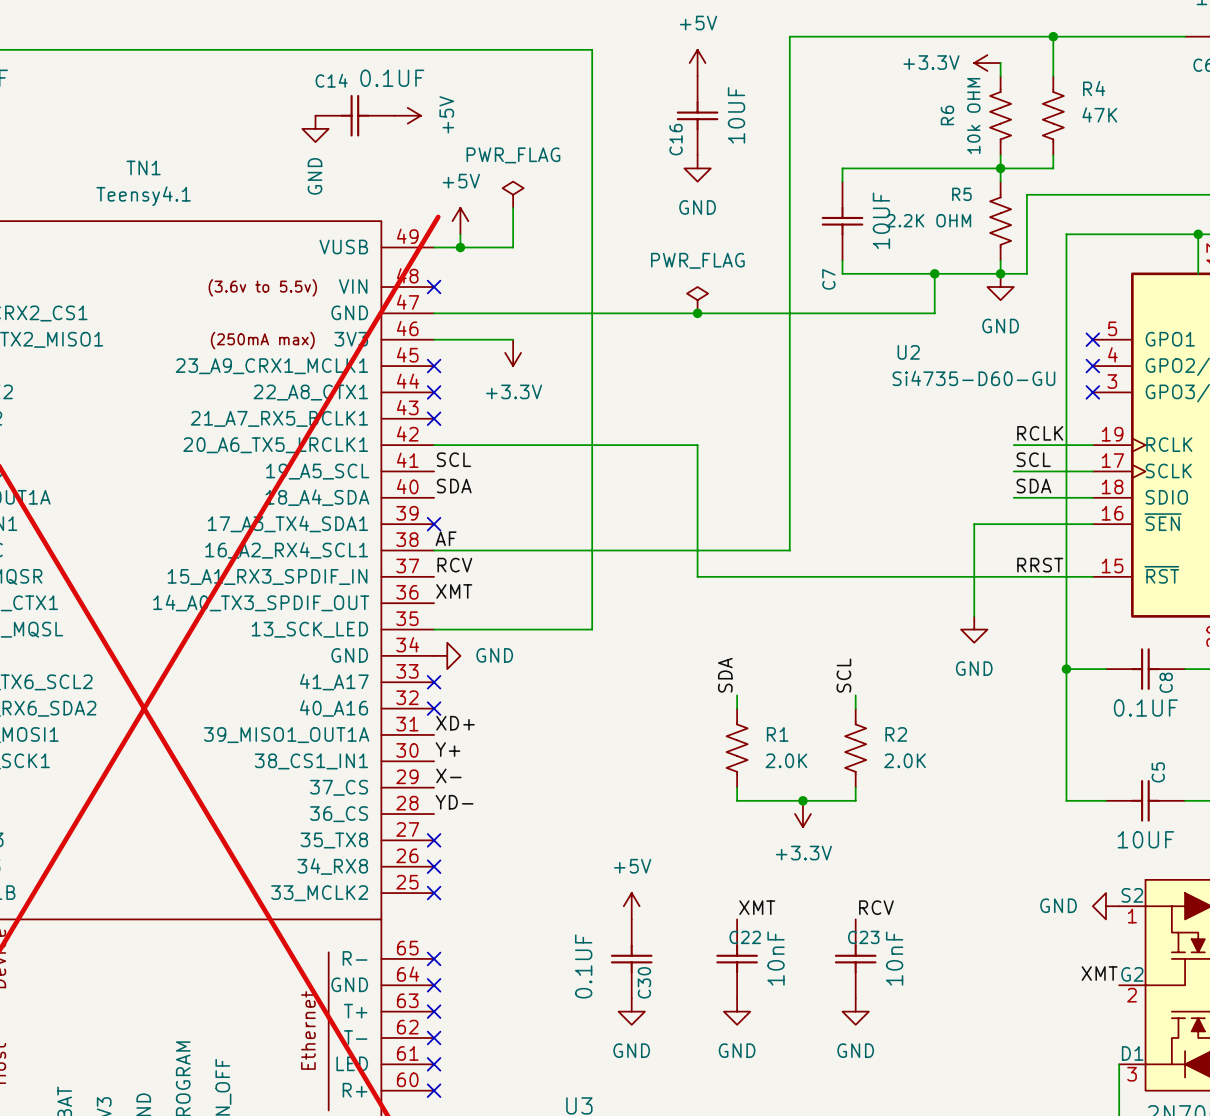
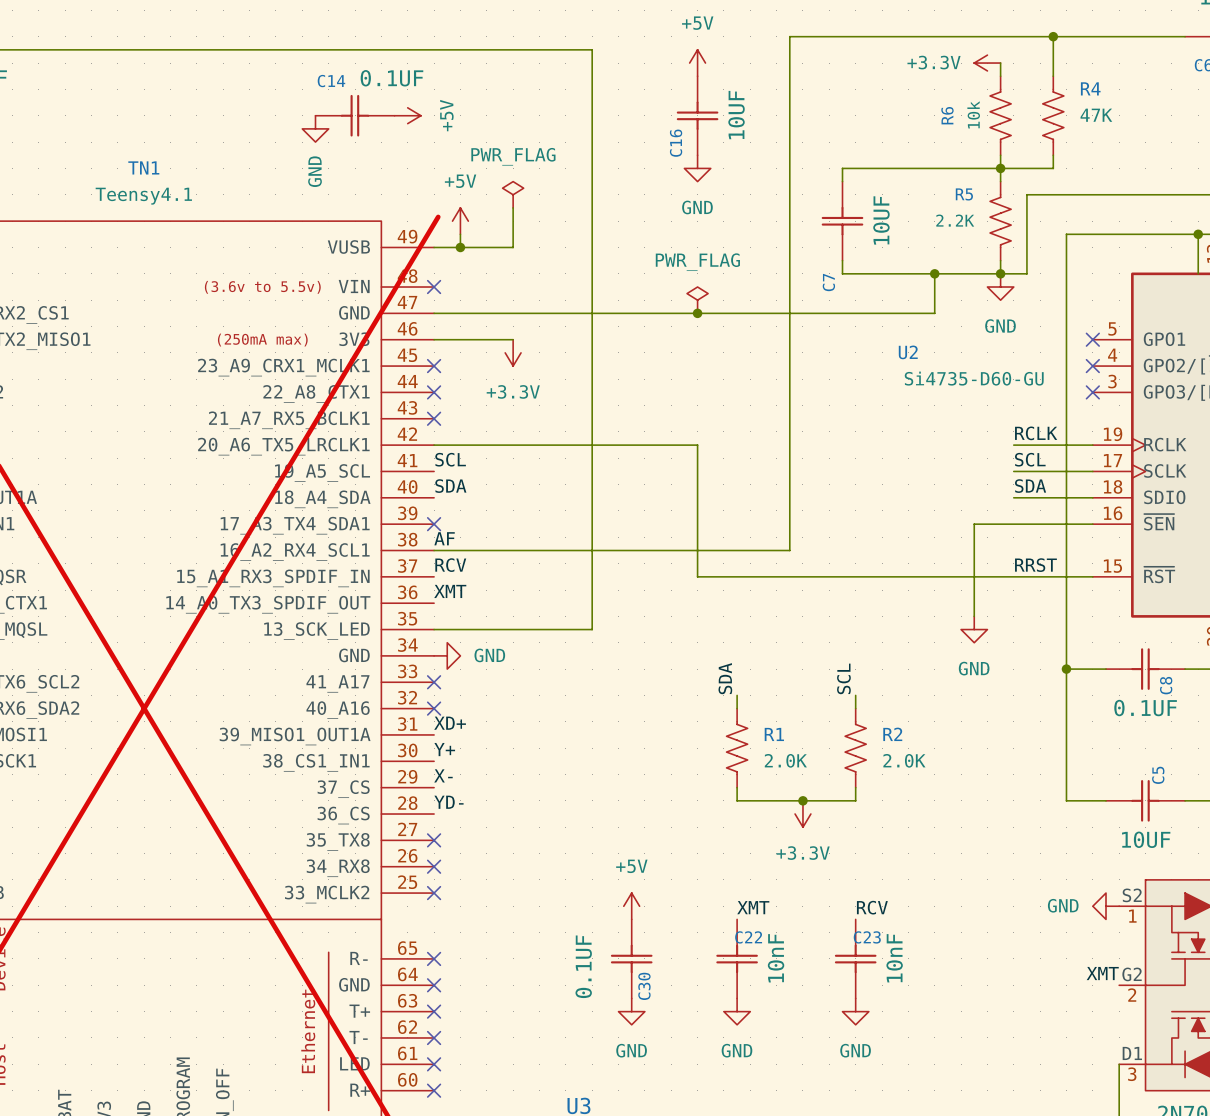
R6 value: 10k OHM (973, 116) -> 10k (973, 114)
R5 value: 2.2K OHM (928, 220) -> 2.2K (955, 220)

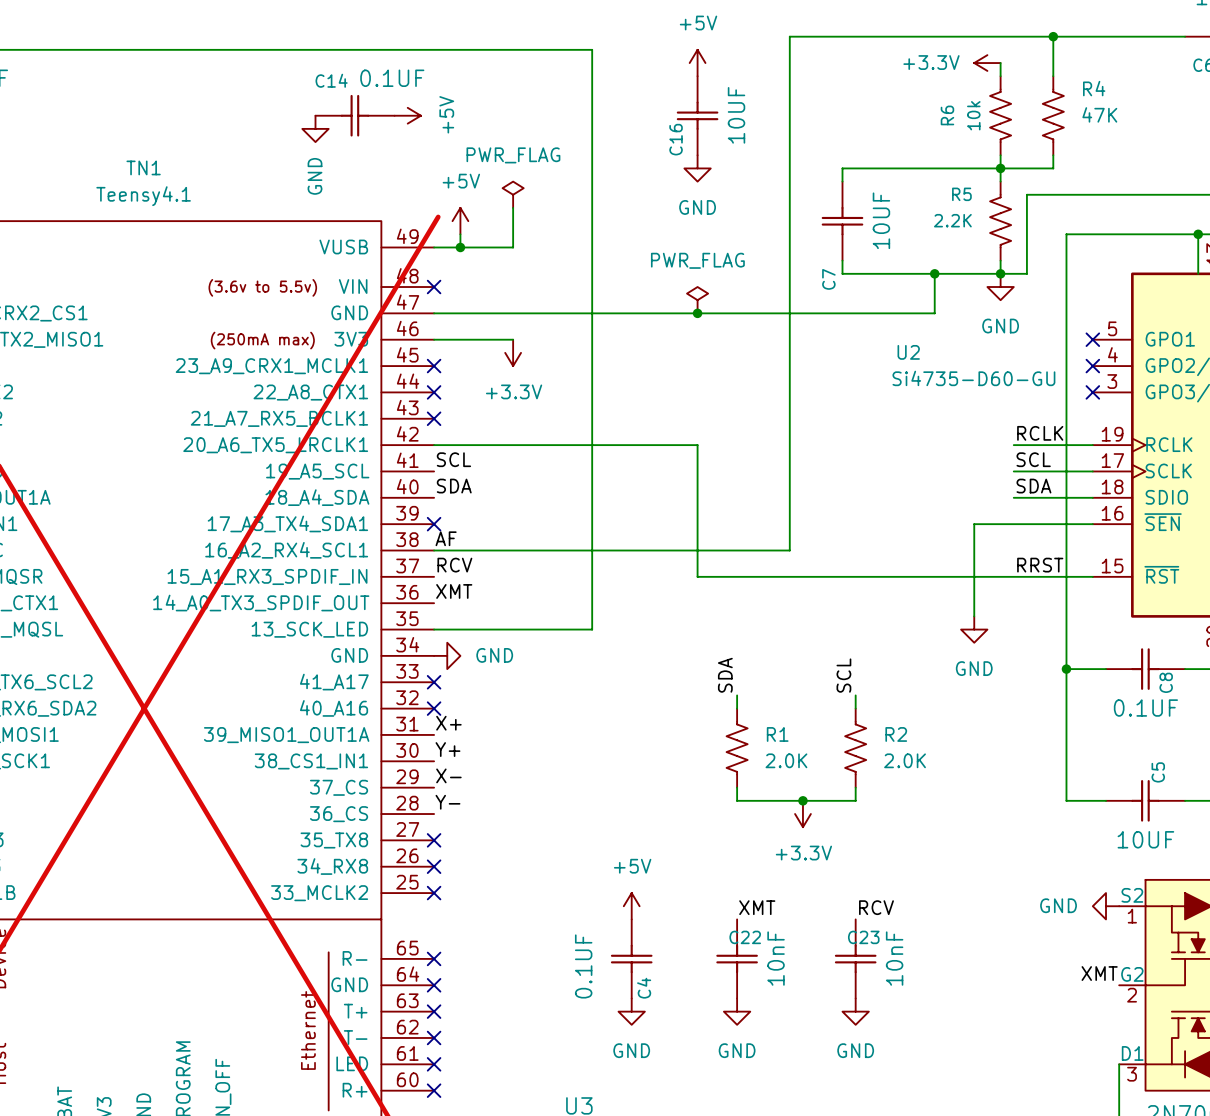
label: XD+ (450, 723) -> X+ (448, 723)
label: YD- (448, 802) -> Y- (447, 802)
C30 name: C30 (644, 986) -> C4 (644, 988)

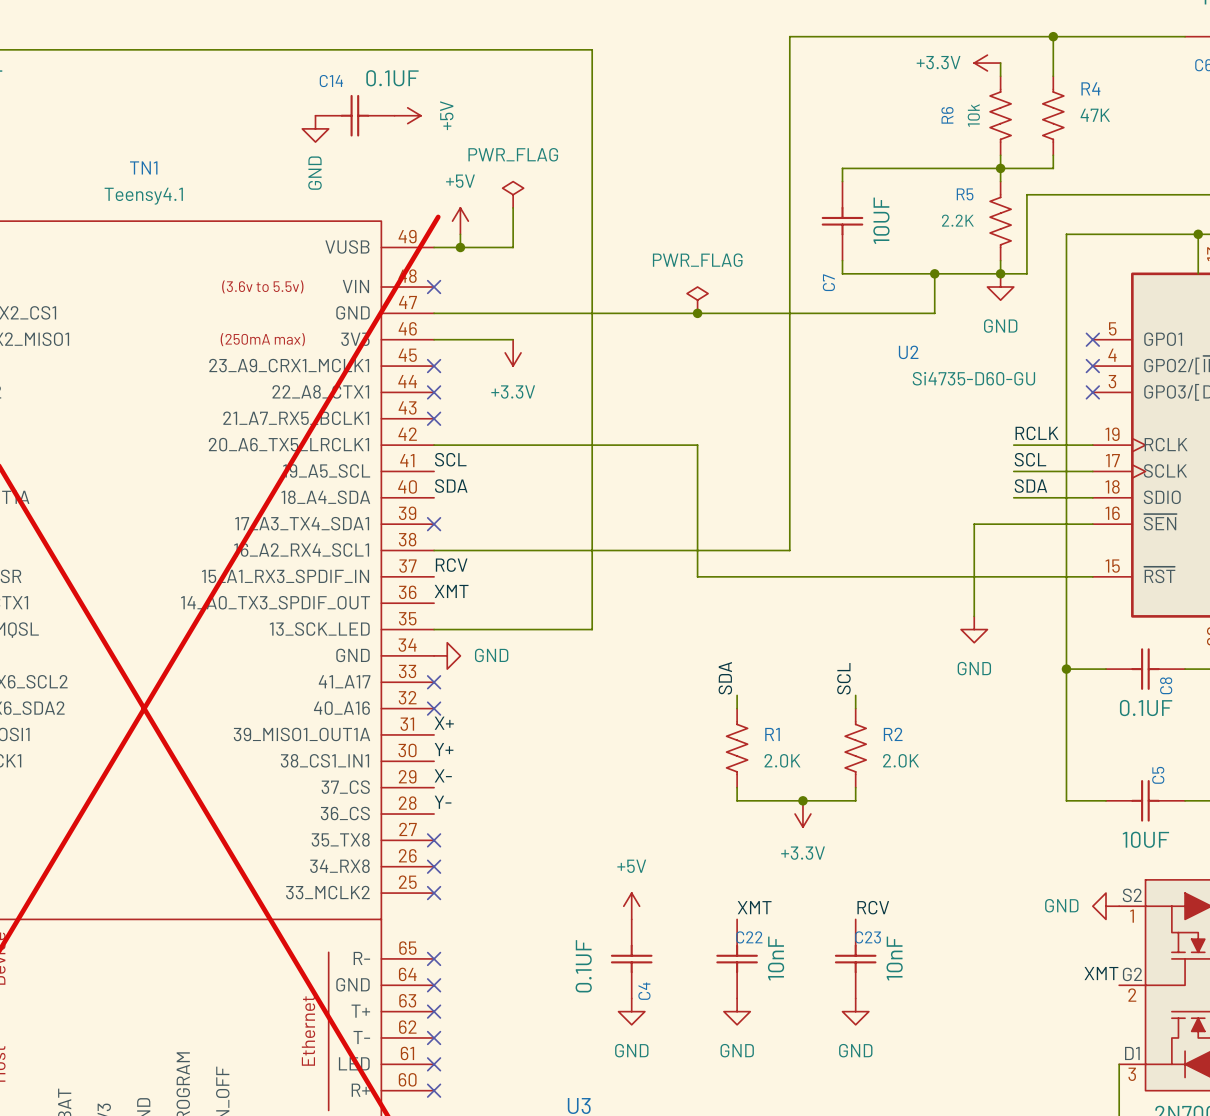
power symbol: +5V (697, 63) -> none
C16: 10UF (697, 115) -> none
power symbol: GND (697, 168) -> none
label: AF (446, 538) -> none
label: RRST (1040, 565) -> none

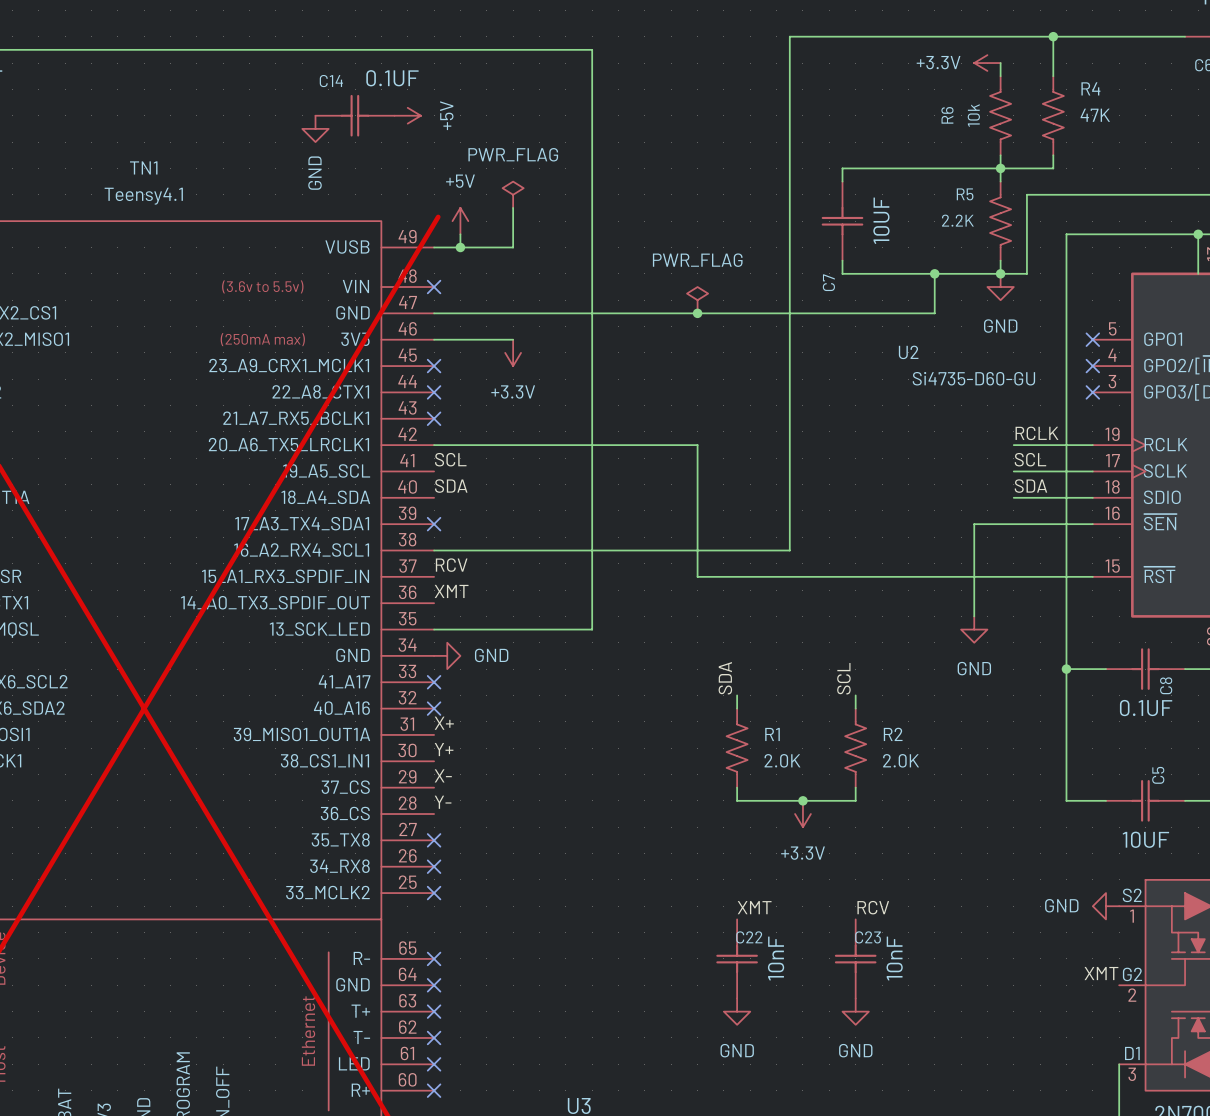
power symbol: +5V (631, 906) -> none
C4: 0.1UF (631, 958) -> none
power symbol: GND (631, 1011) -> none

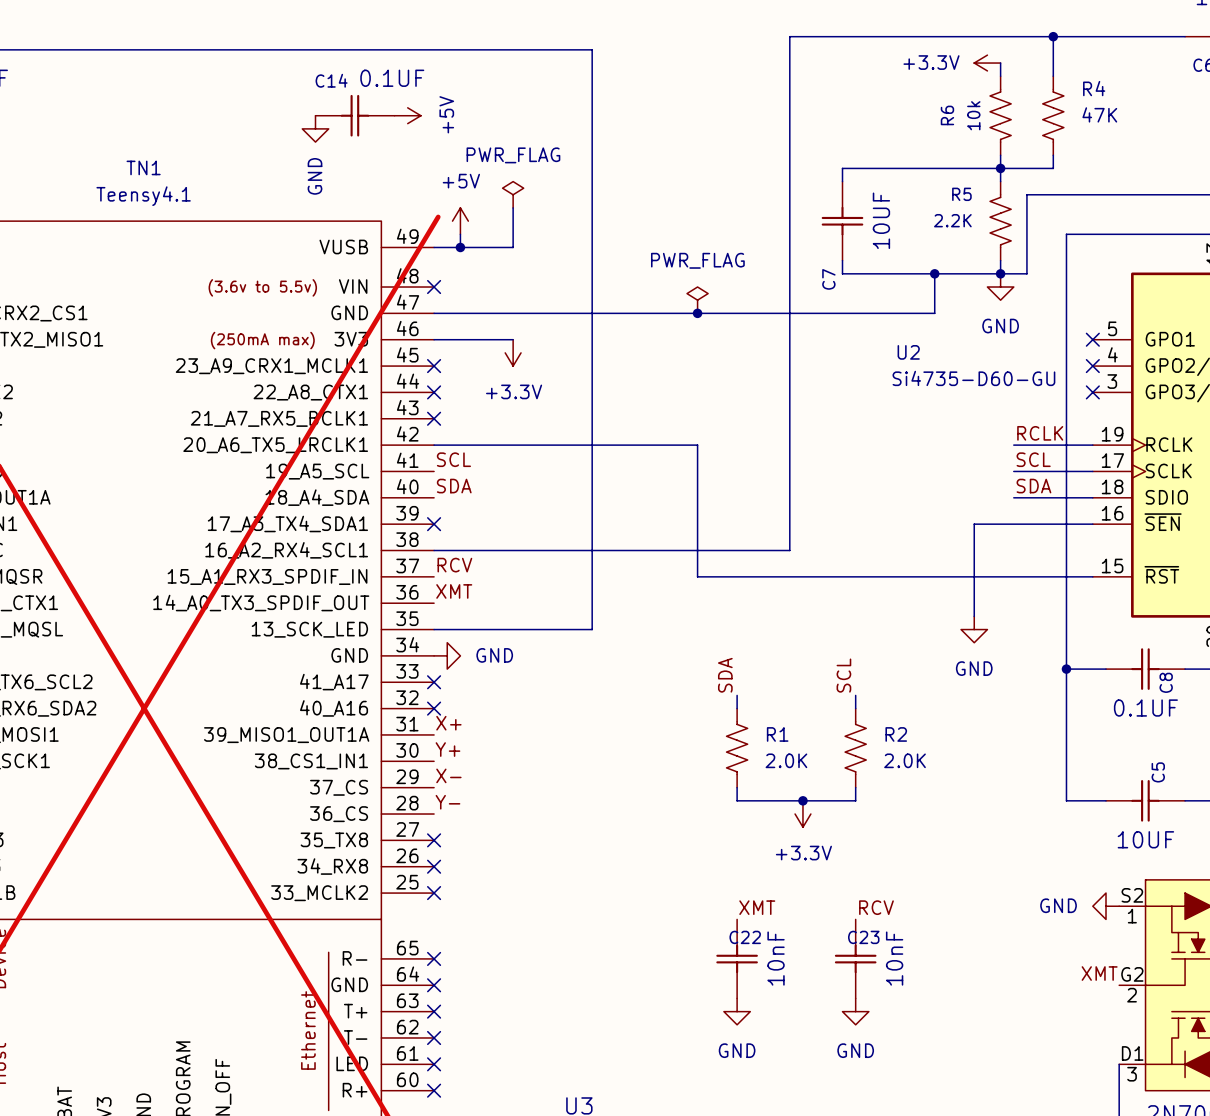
wire: (1198, 234) (1198, 273) -> none
junction: (1198, 234) -> none

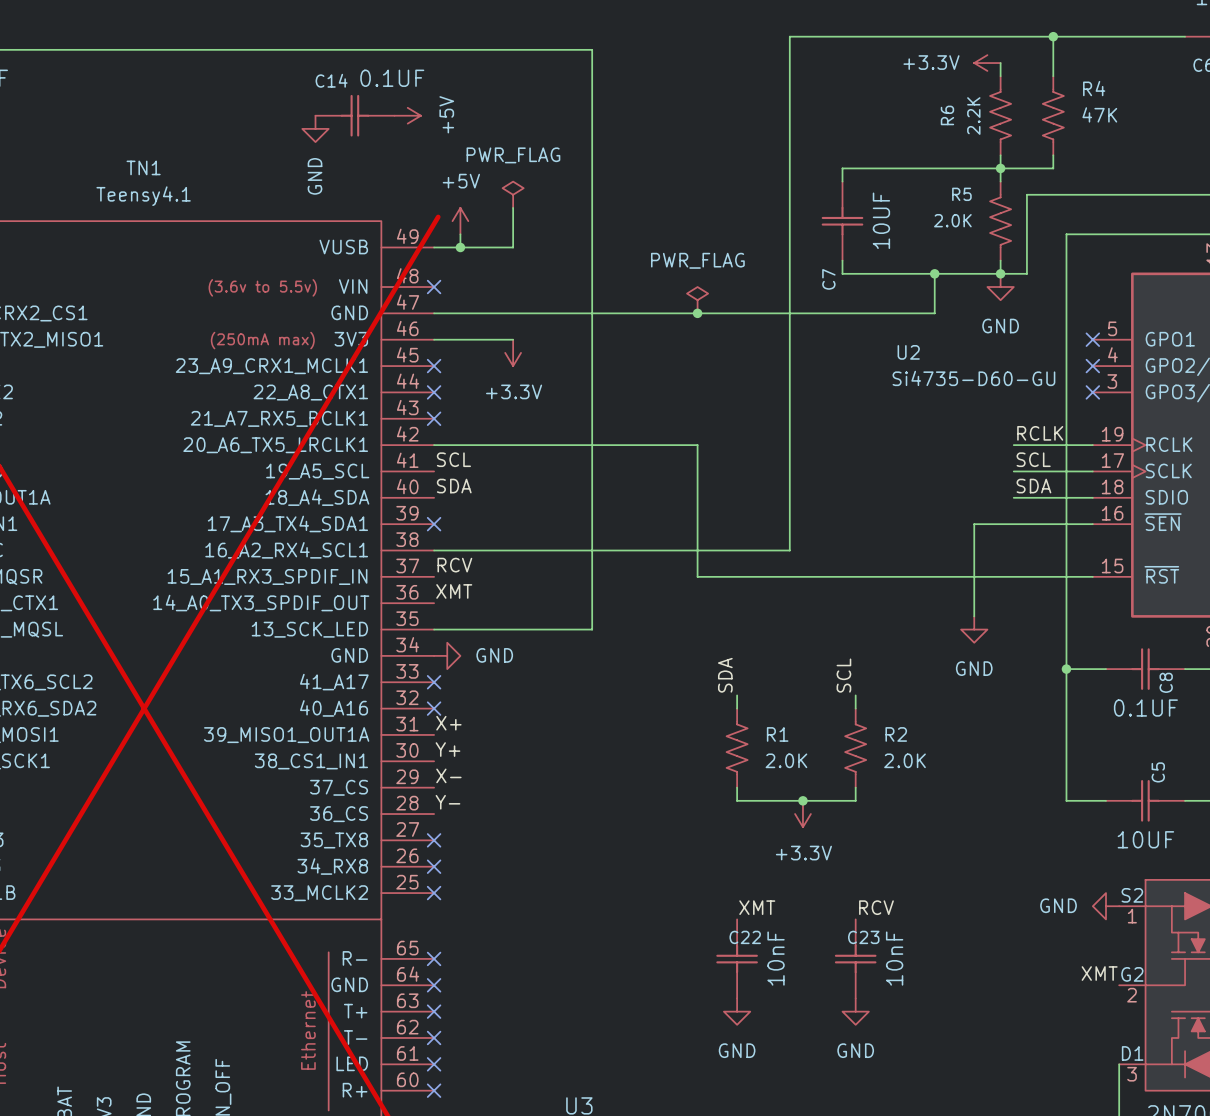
R6 value: 10k (973, 115) -> 2.2K (973, 116)
R5 value: 2.2K (952, 220) -> 2.0K (952, 220)

